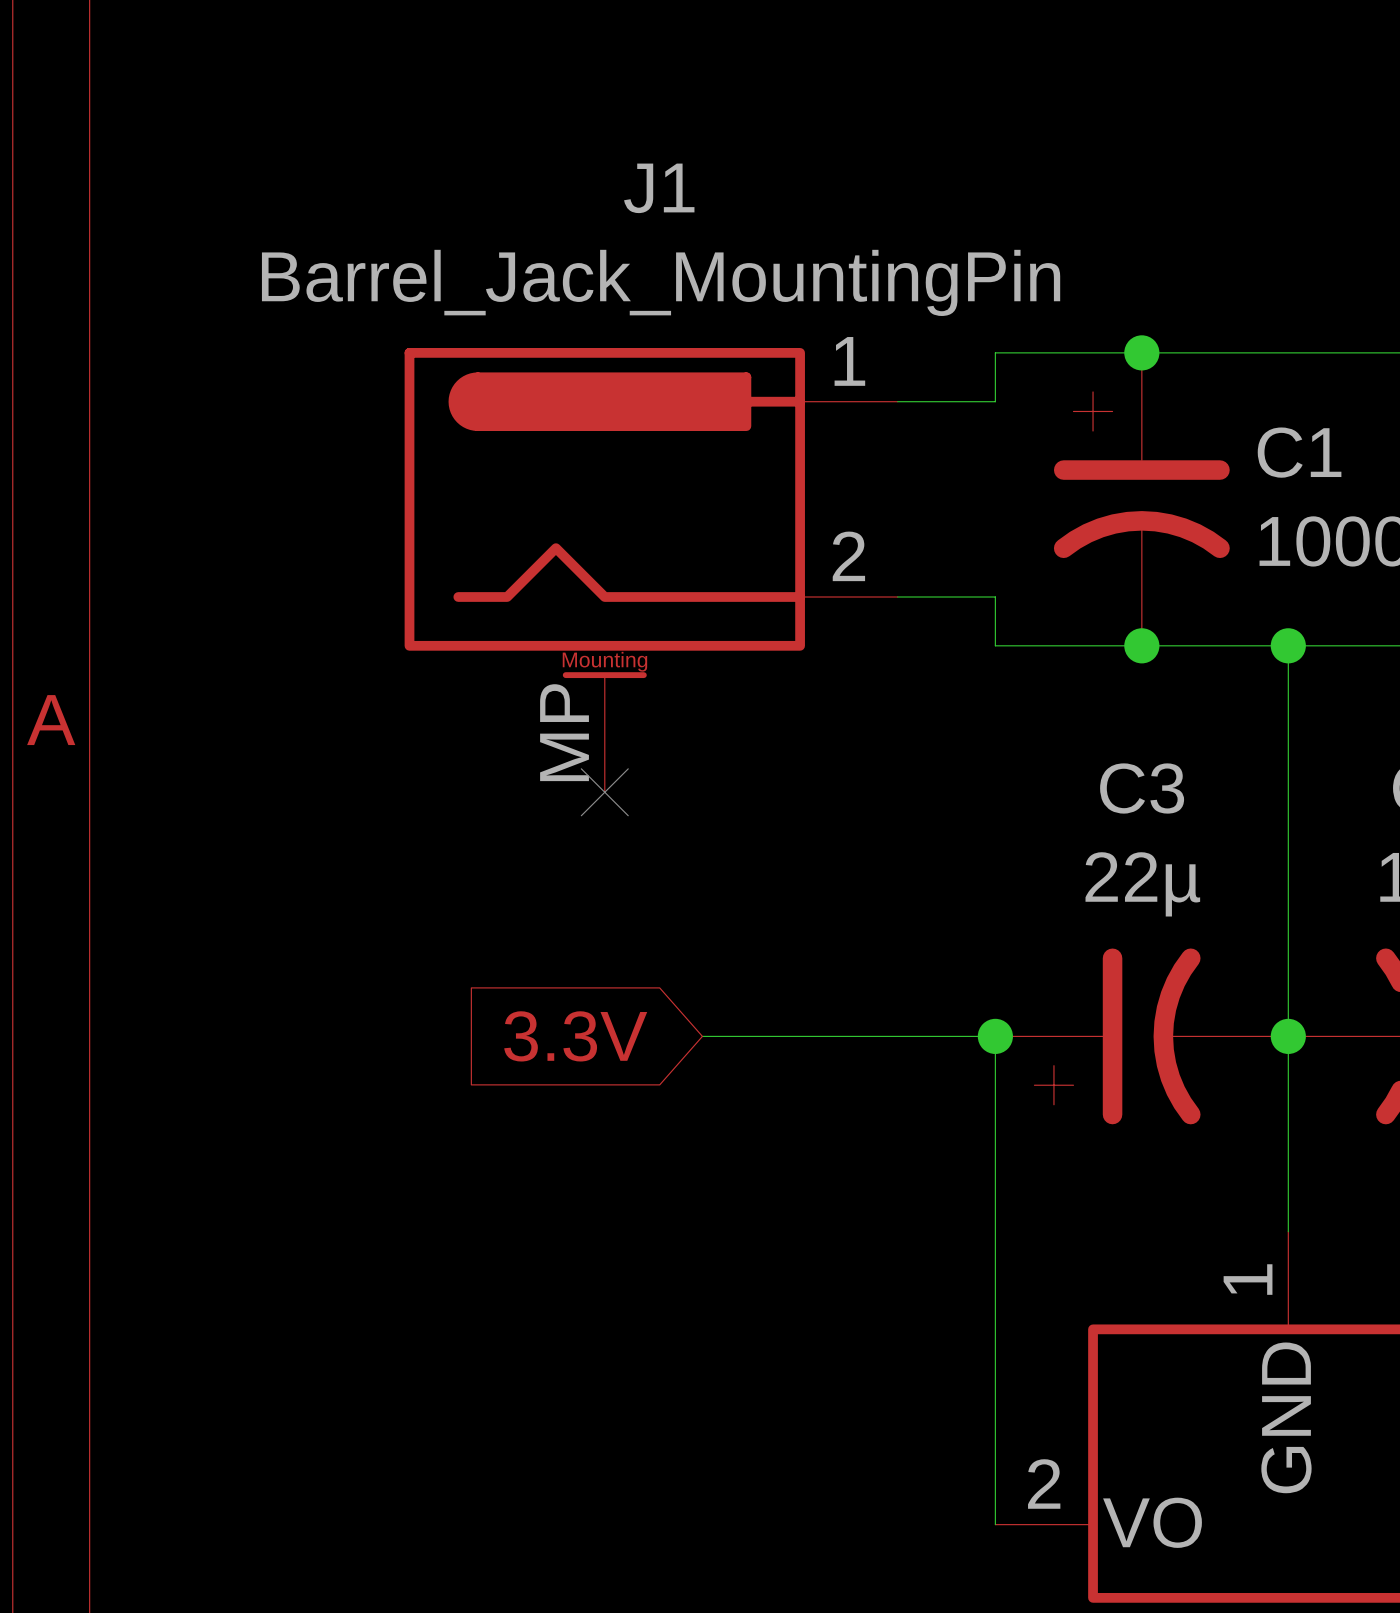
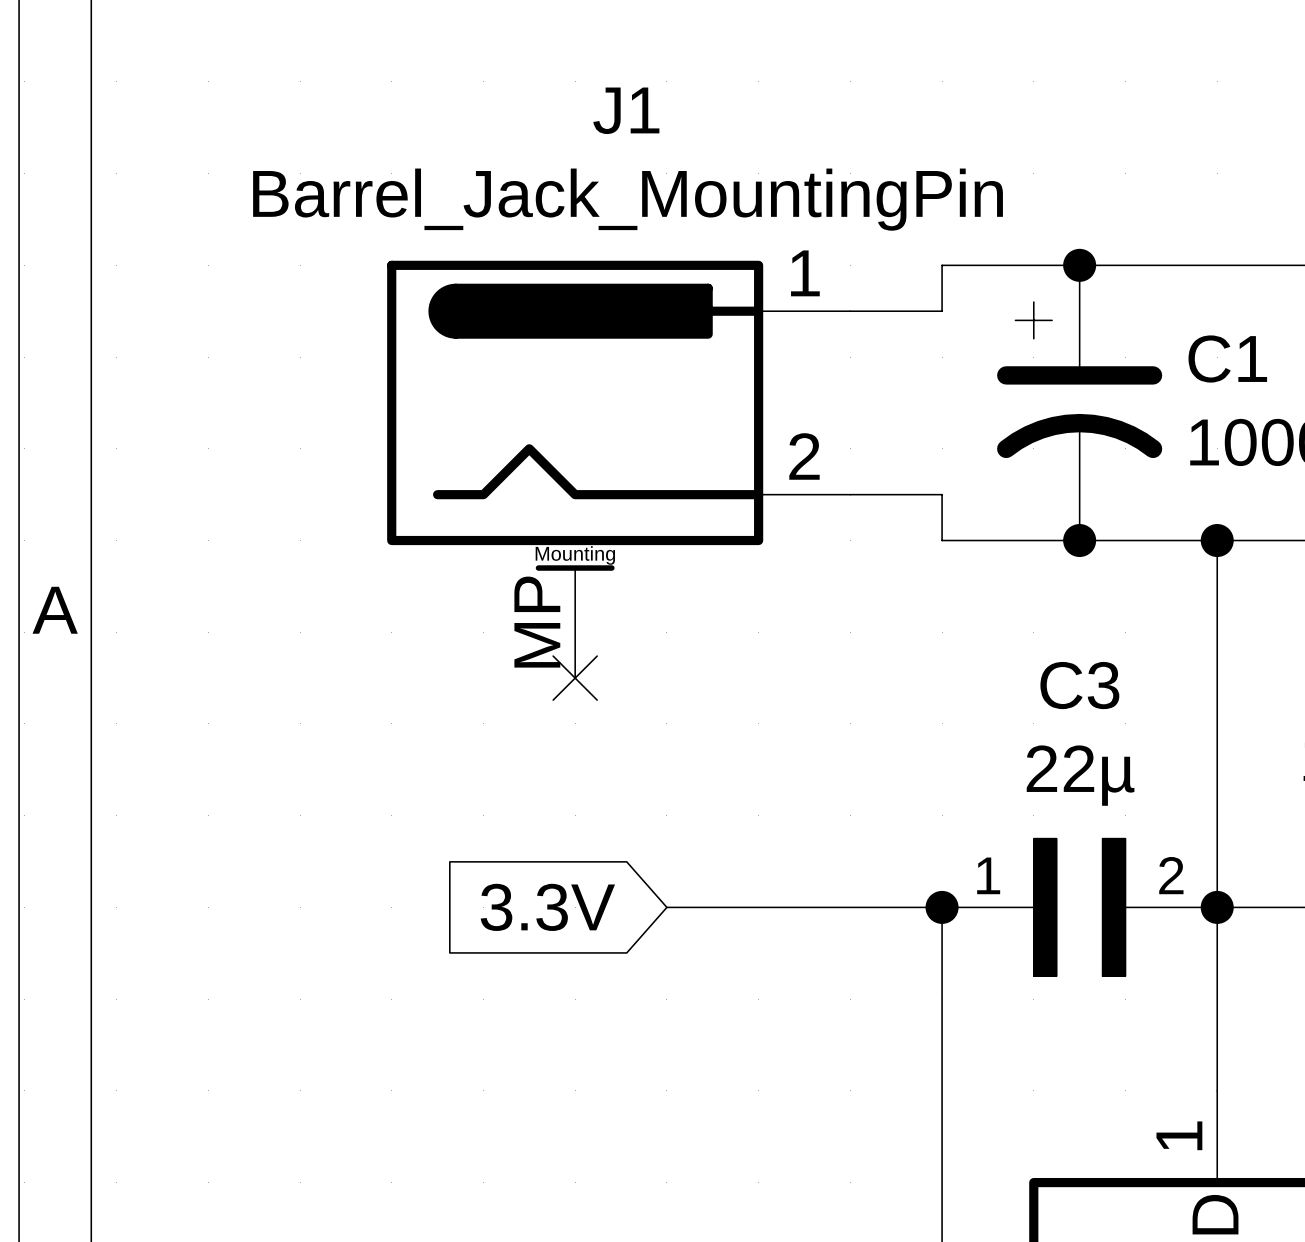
C3 symbol: [995, 948, 1289, 1125] -> [942, 838, 1218, 977]

